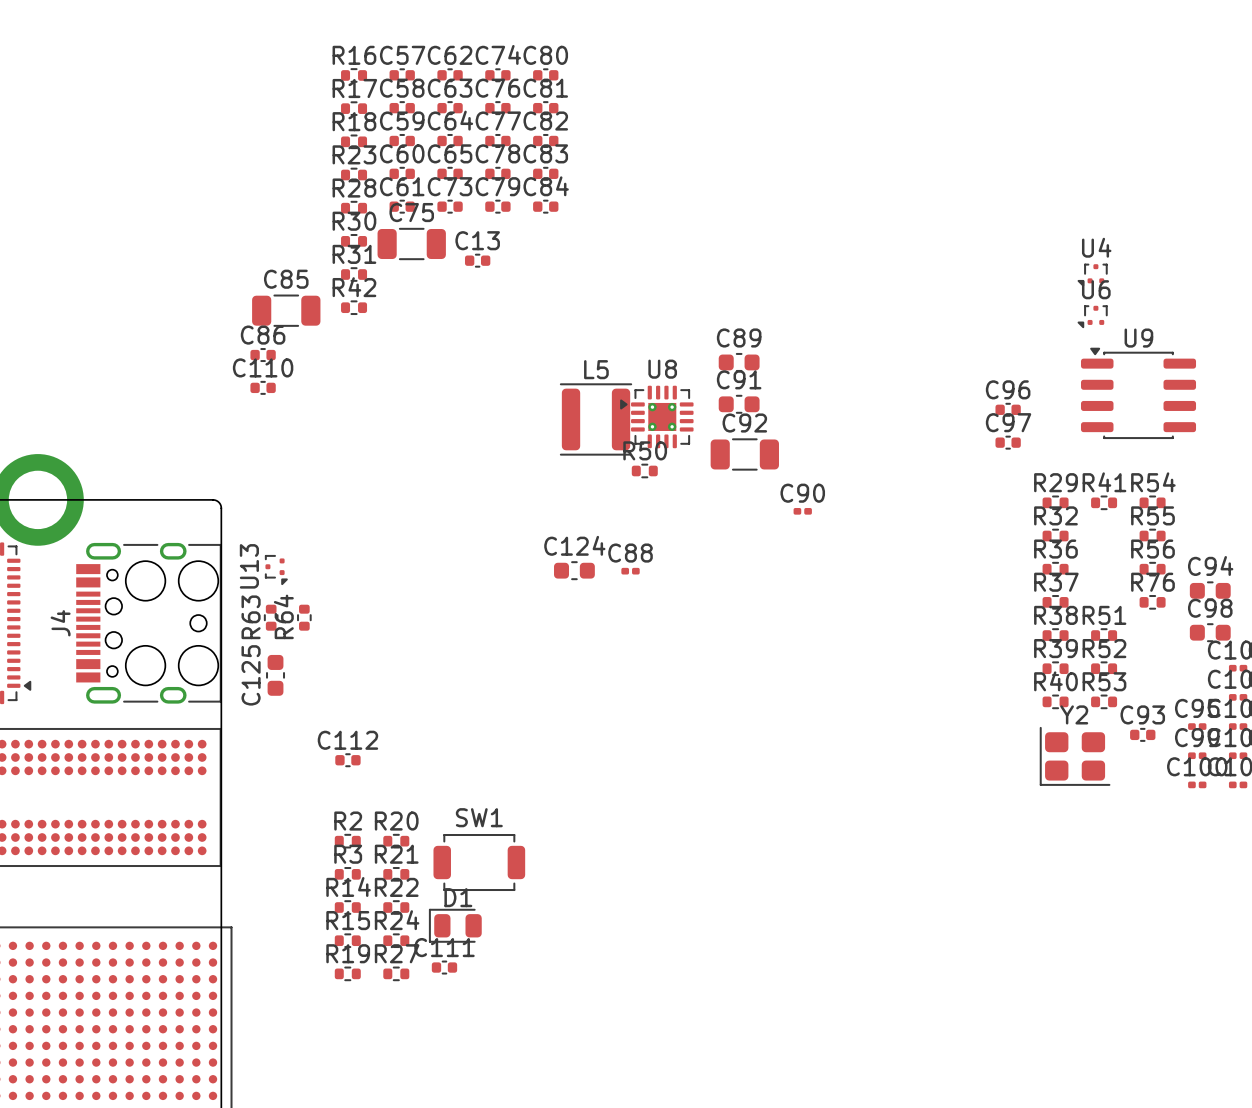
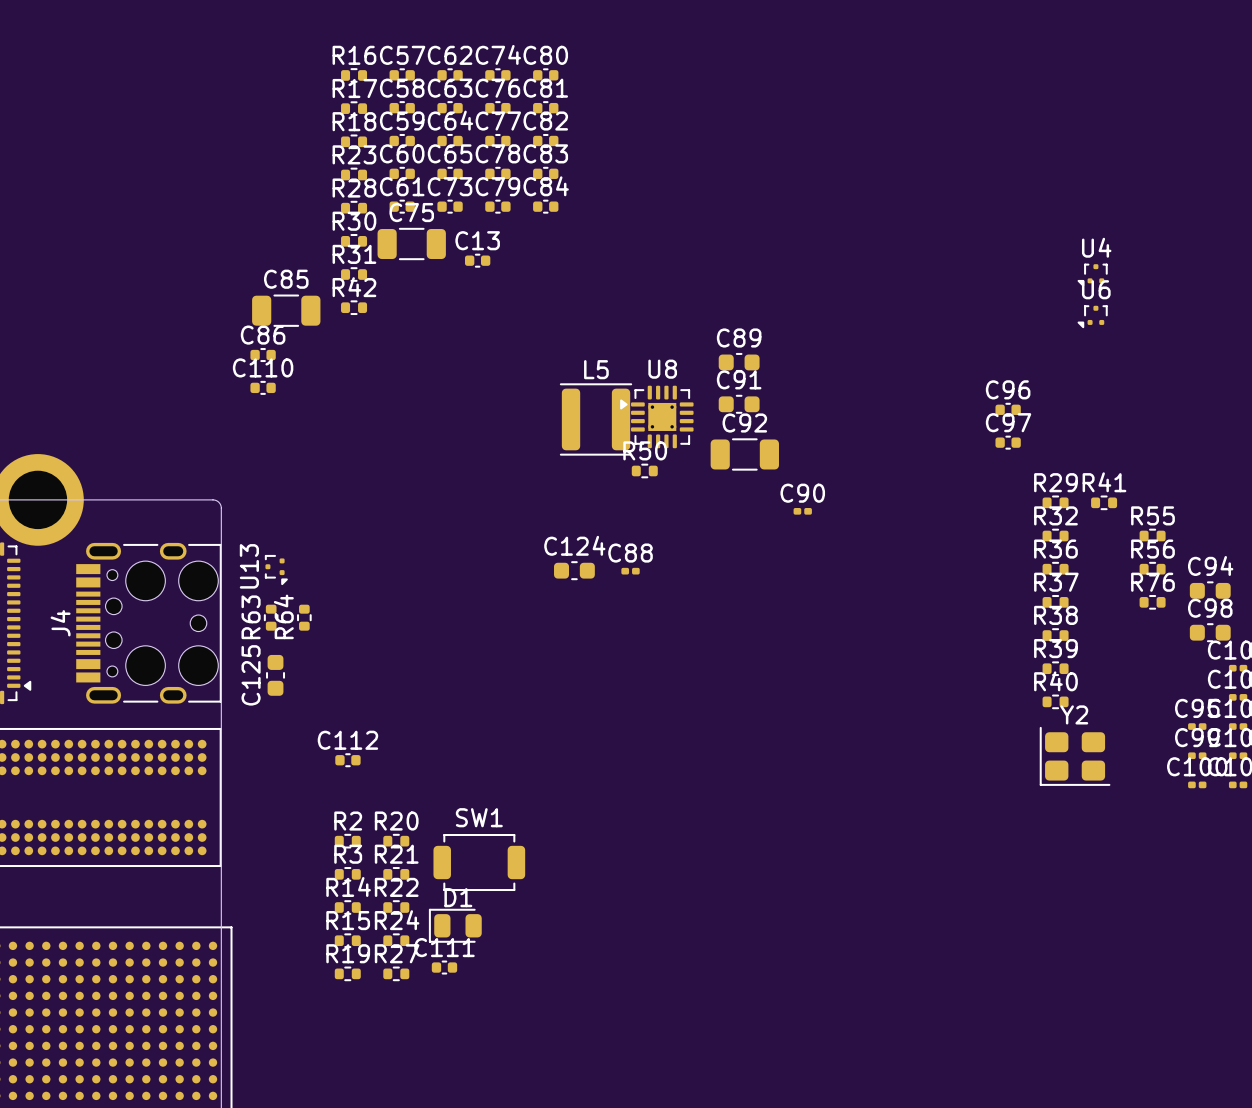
U9: (1138, 393) -> none
R54: (1152, 502) -> none
R51: (1104, 635) -> none
R52: (1104, 668) -> none
R53: (1104, 701) -> none
C93: (1142, 734) -> none

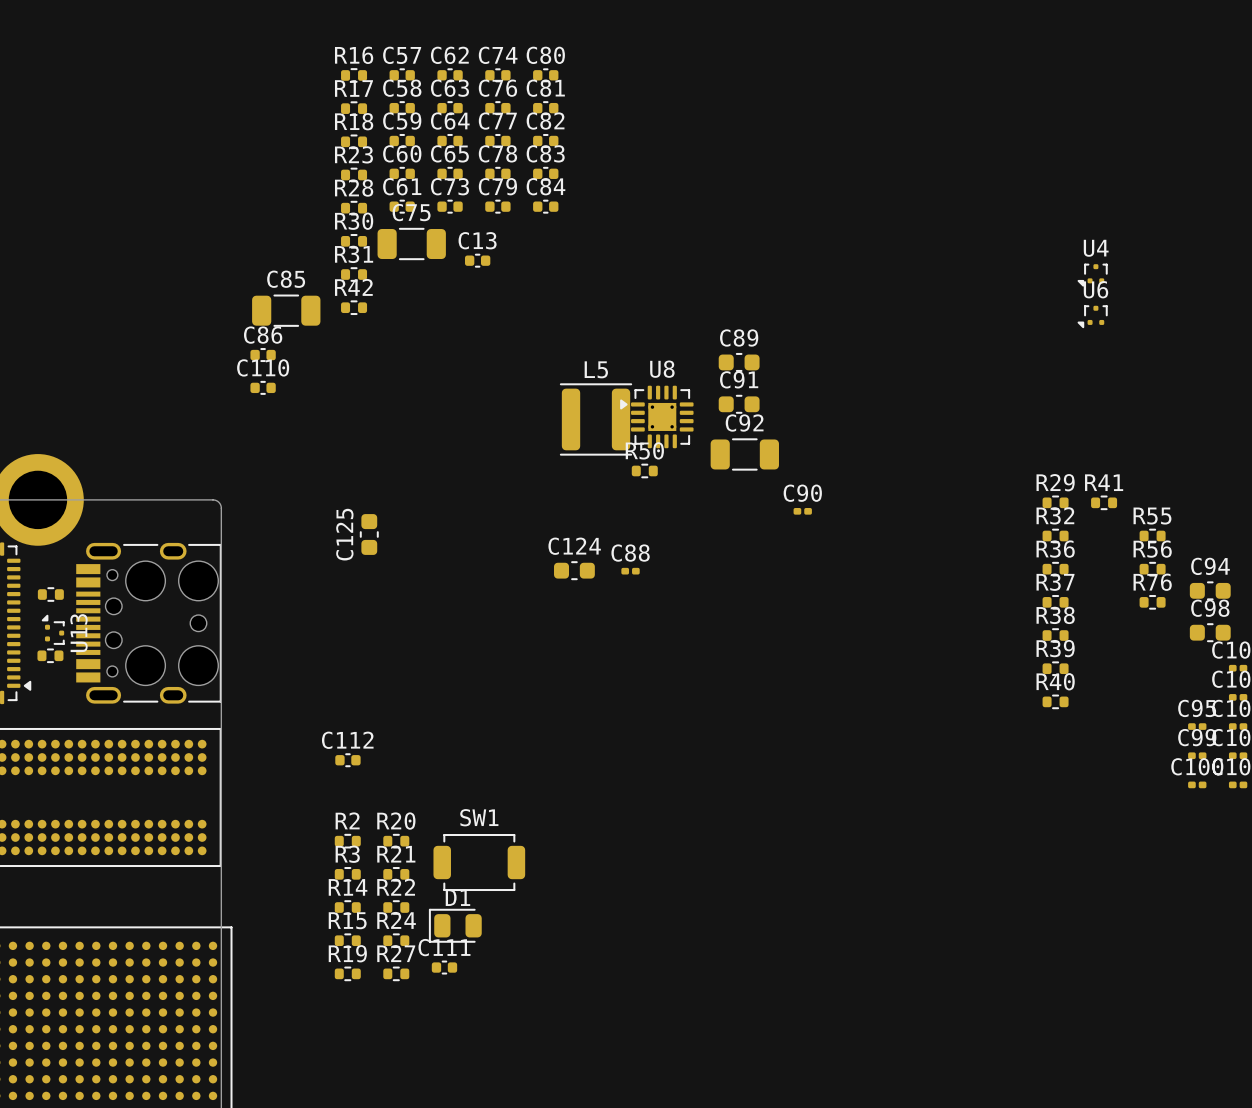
C96: (1008, 409) -> none
C97: (1008, 442) -> none
U13 rotation: 0° (276, 570) -> 180° (53, 629)
U13 position: (276, 570) -> (53, 629)
part: none -> (50, 594)
R63: (271, 617) -> none
R64: (304, 617) -> none
J4 name: J4 (60, 623) -> none
part: none -> (50, 655)
C125 position: (275, 675) -> (369, 534)
Y2: (1075, 756) -> none

